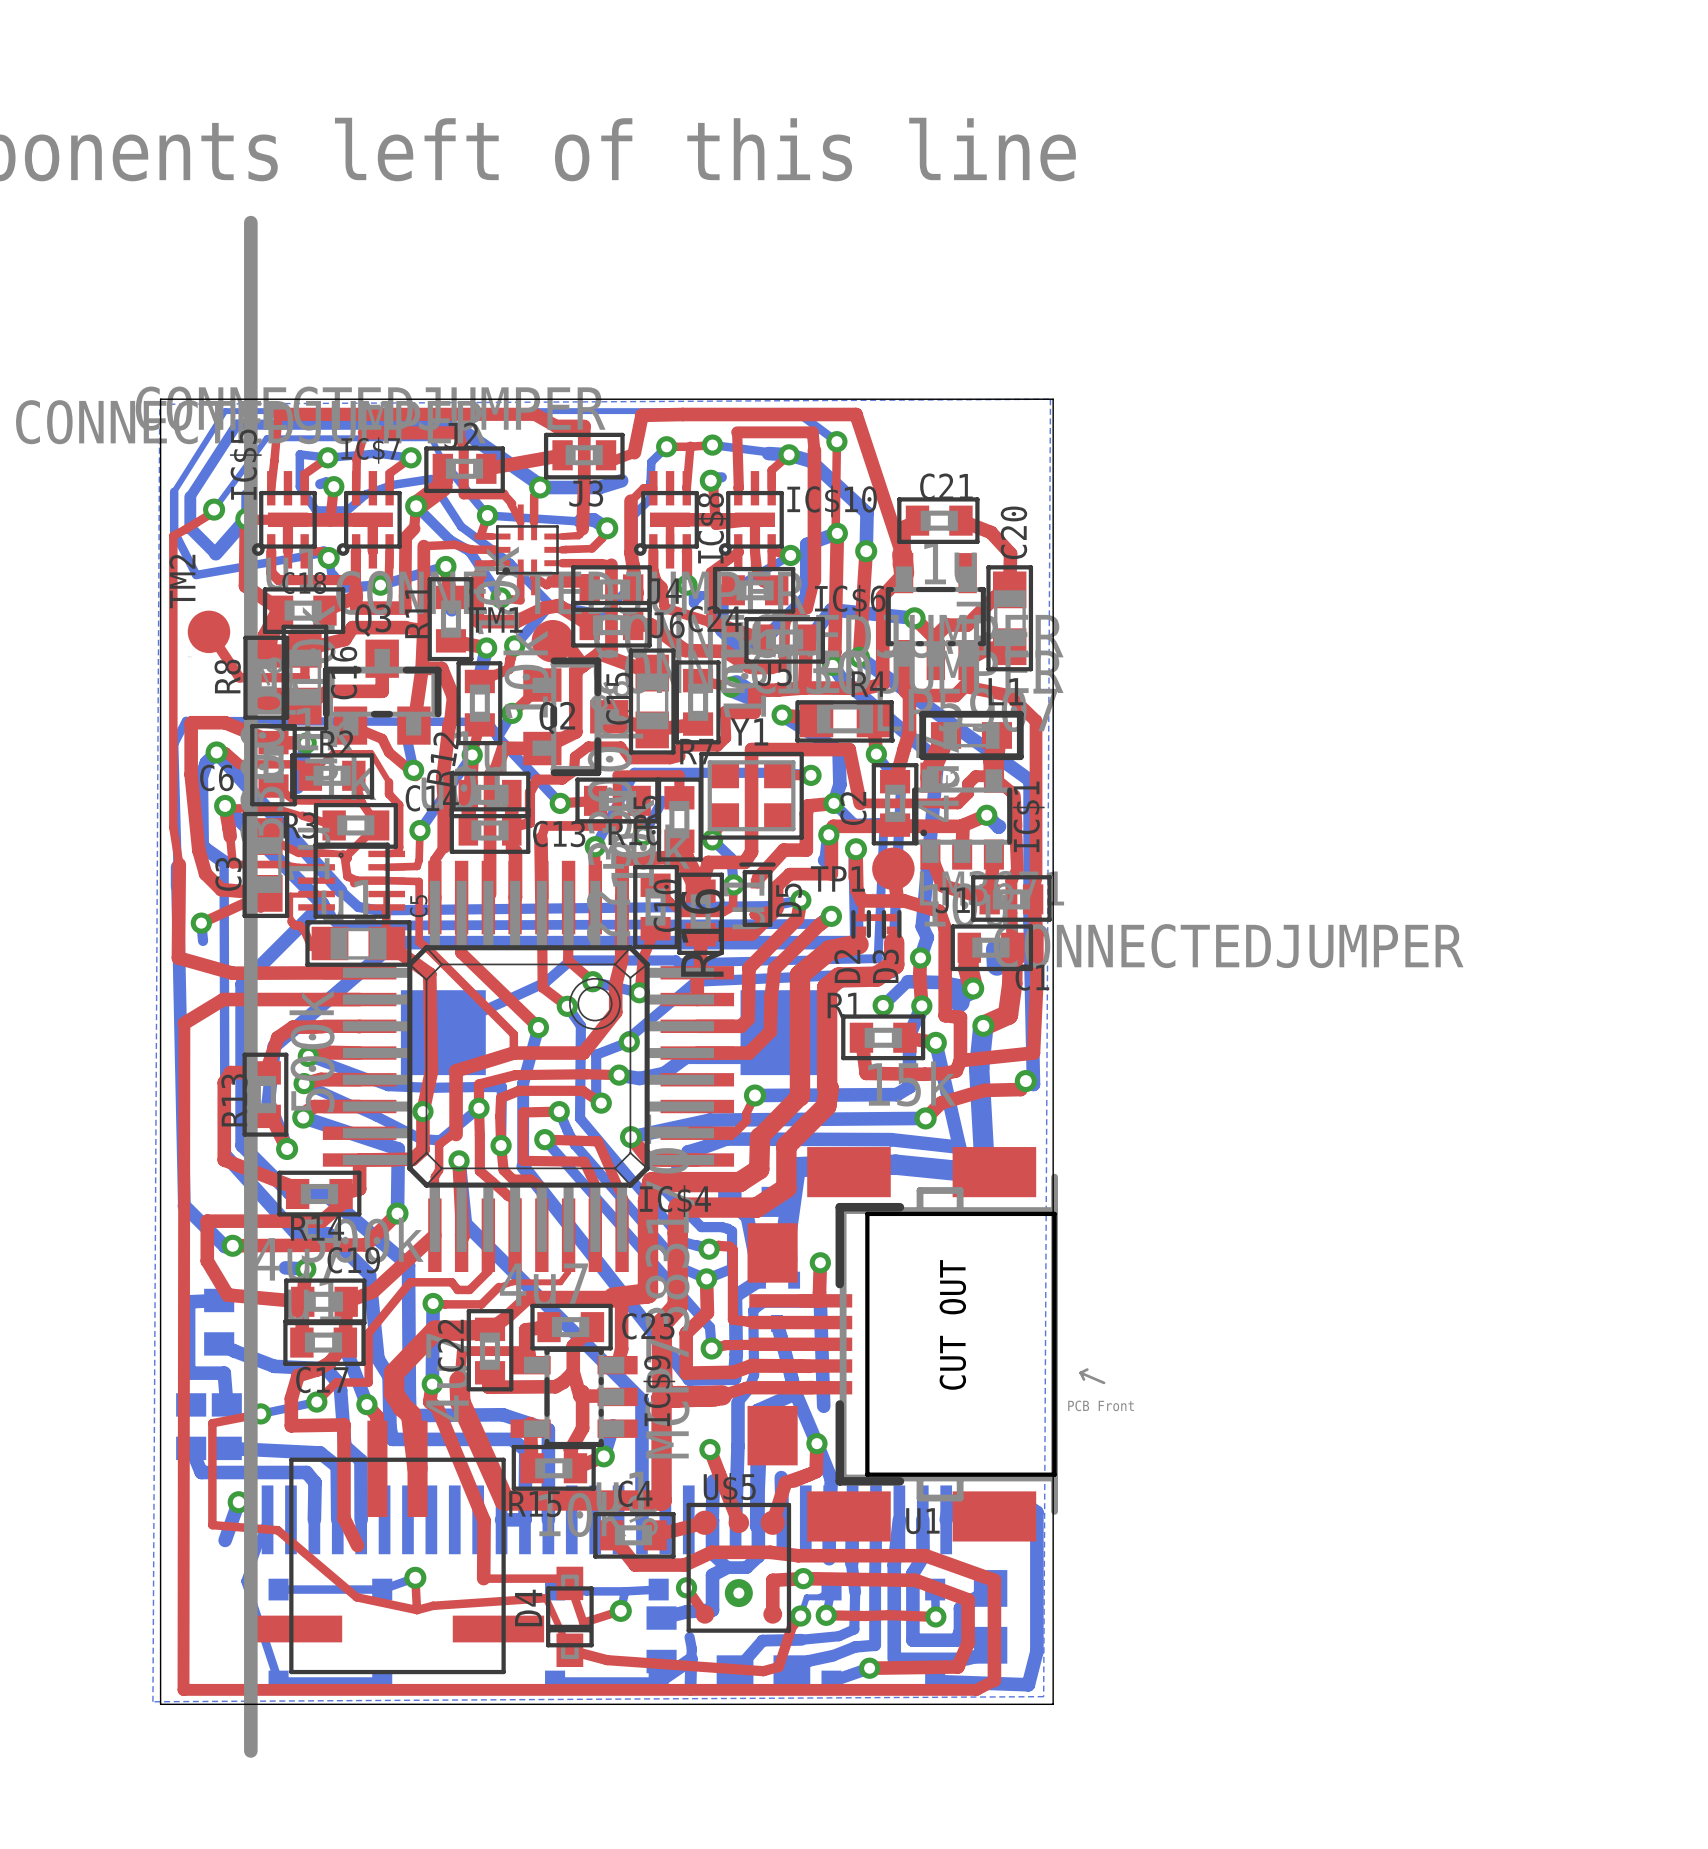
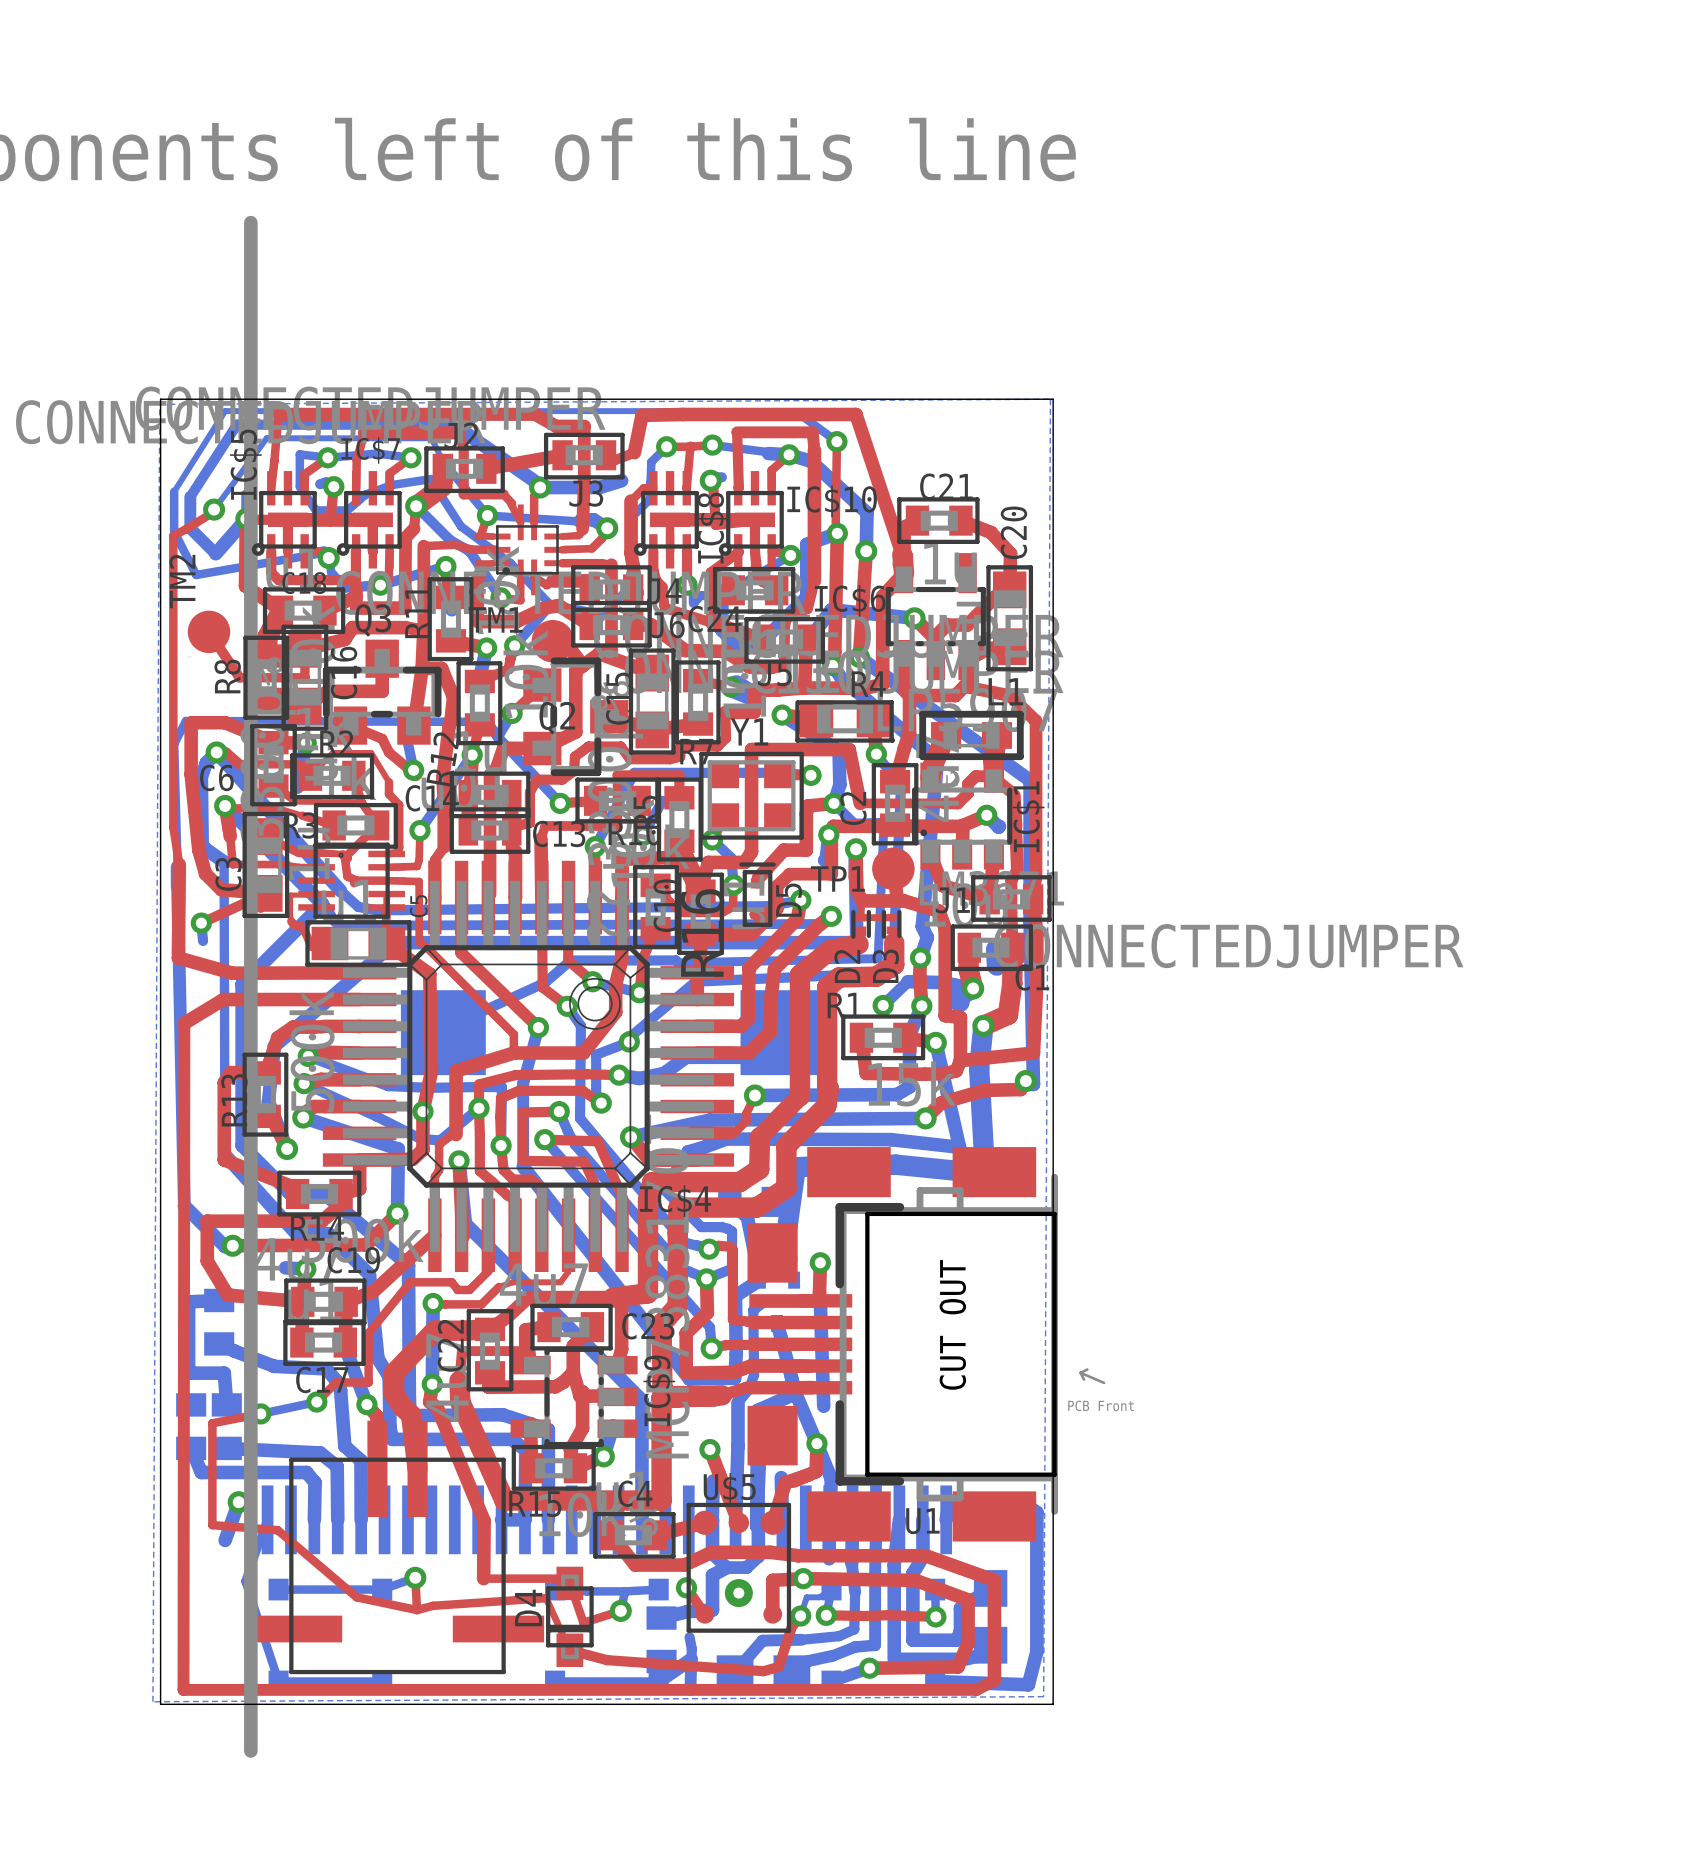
top track: (345, 1342) (330, 1362) (317, 1369) (298, 1375) (291, 1398) (291, 1425) (343, 1424) (343, 1518) (357, 1545) -> none

